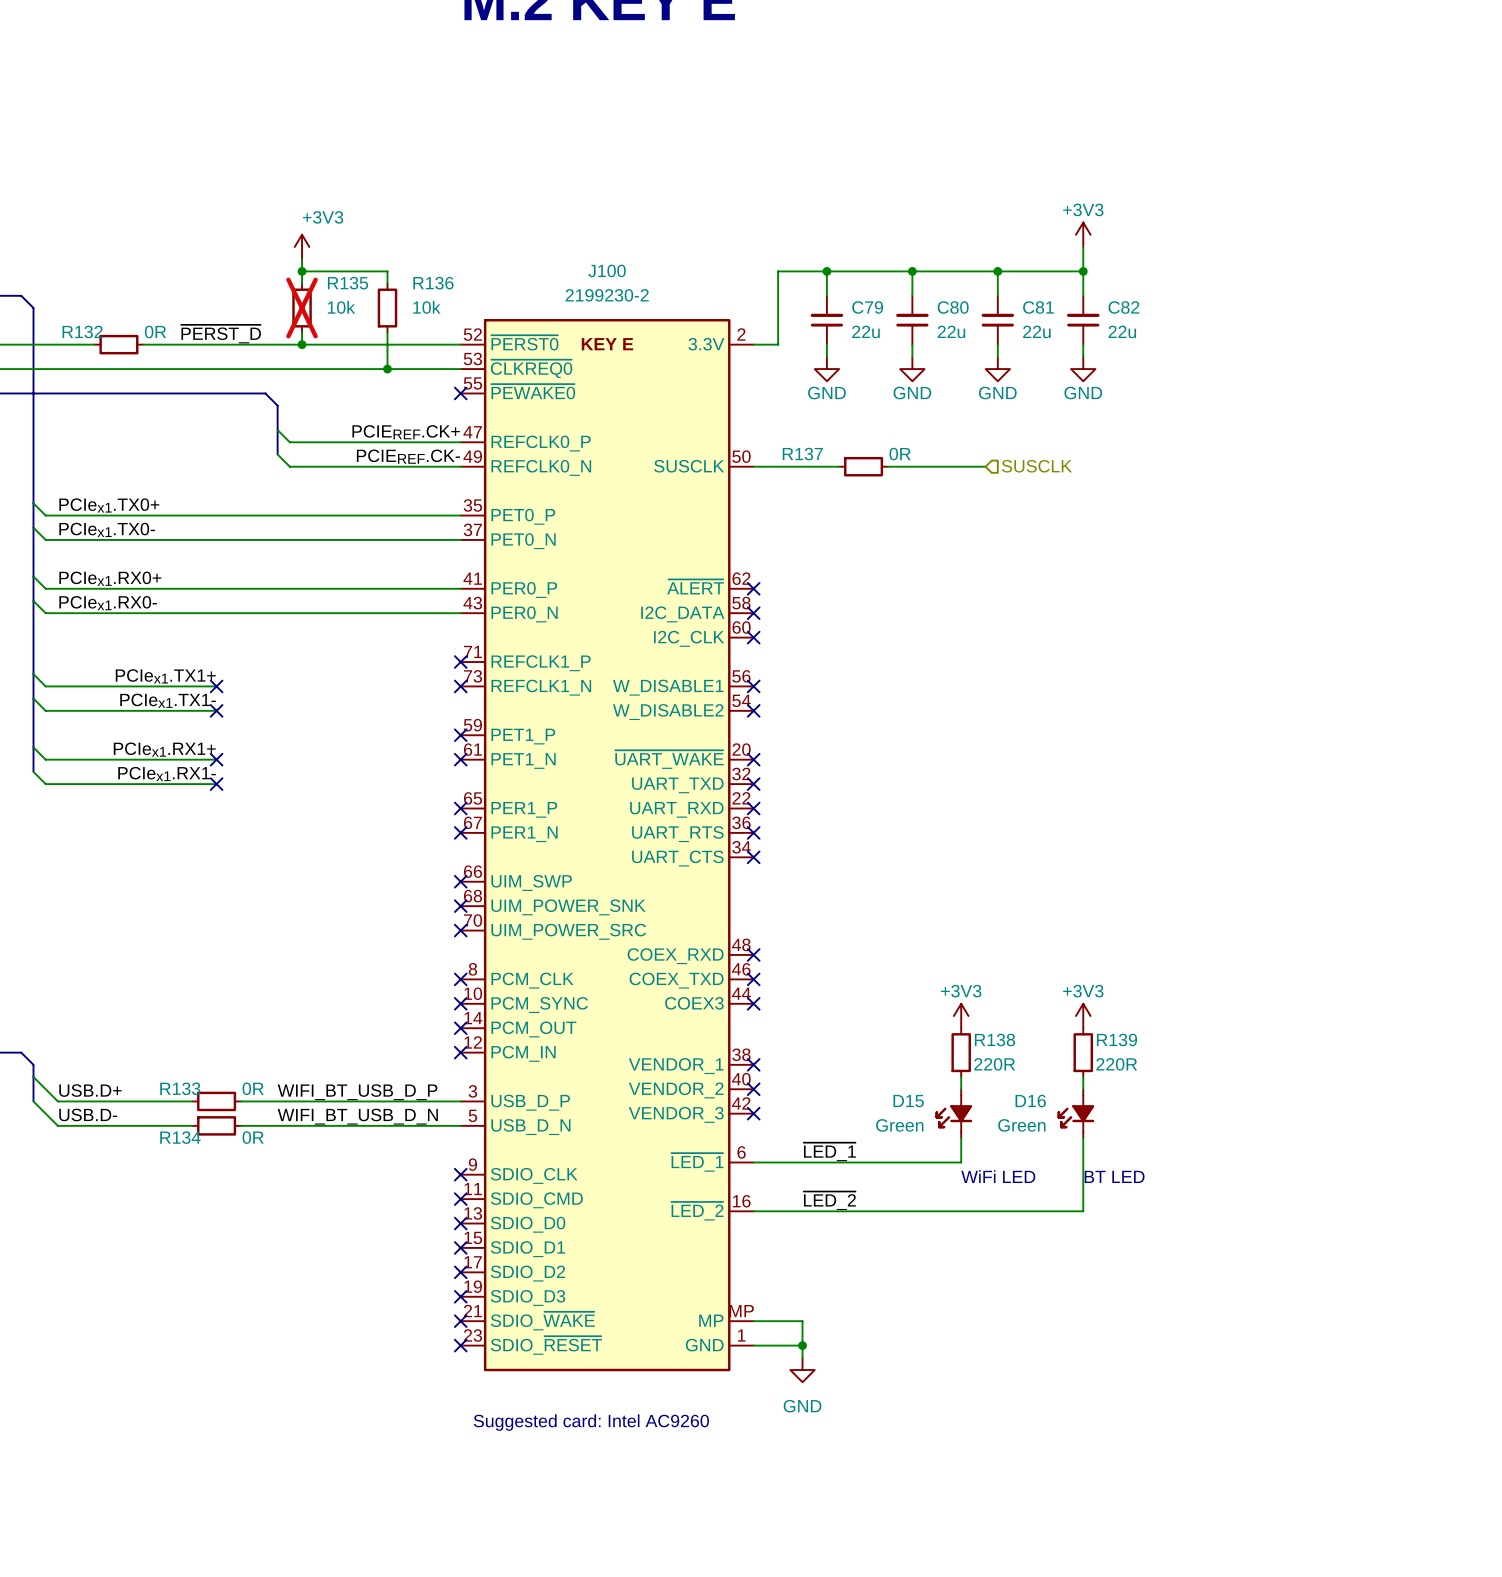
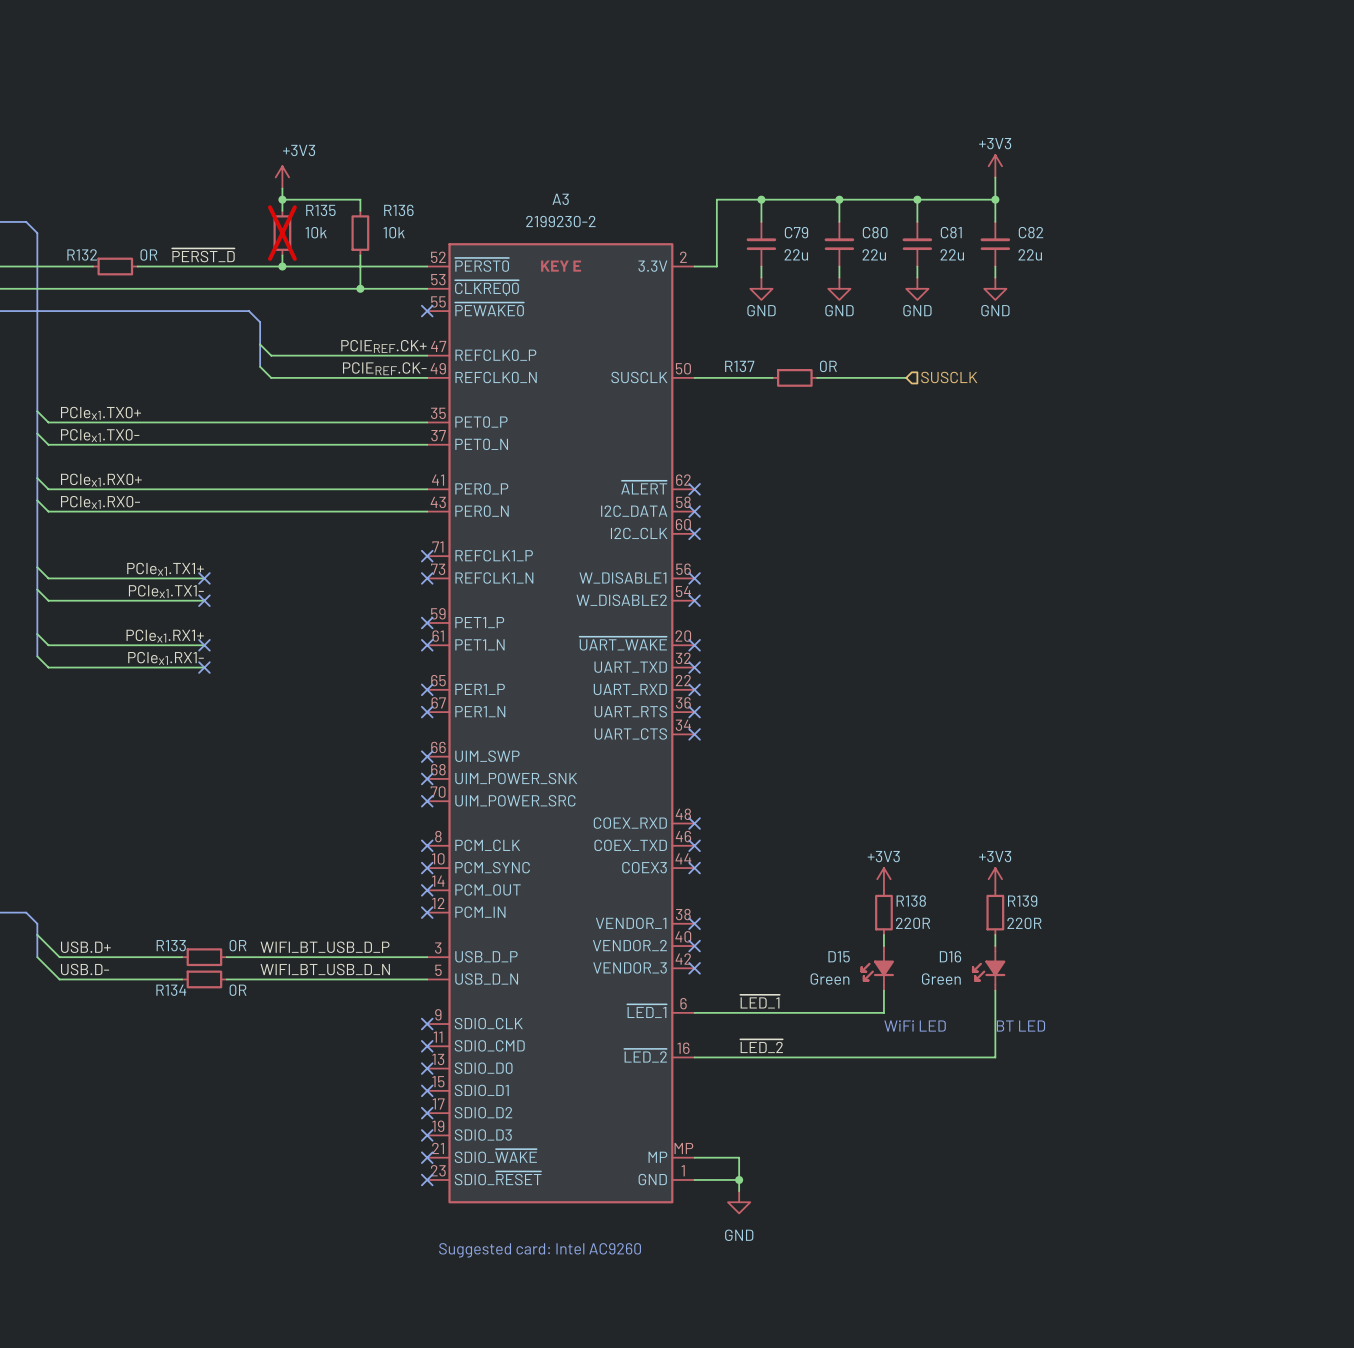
J100 name: J100 (607, 270) -> A3 (560, 199)

